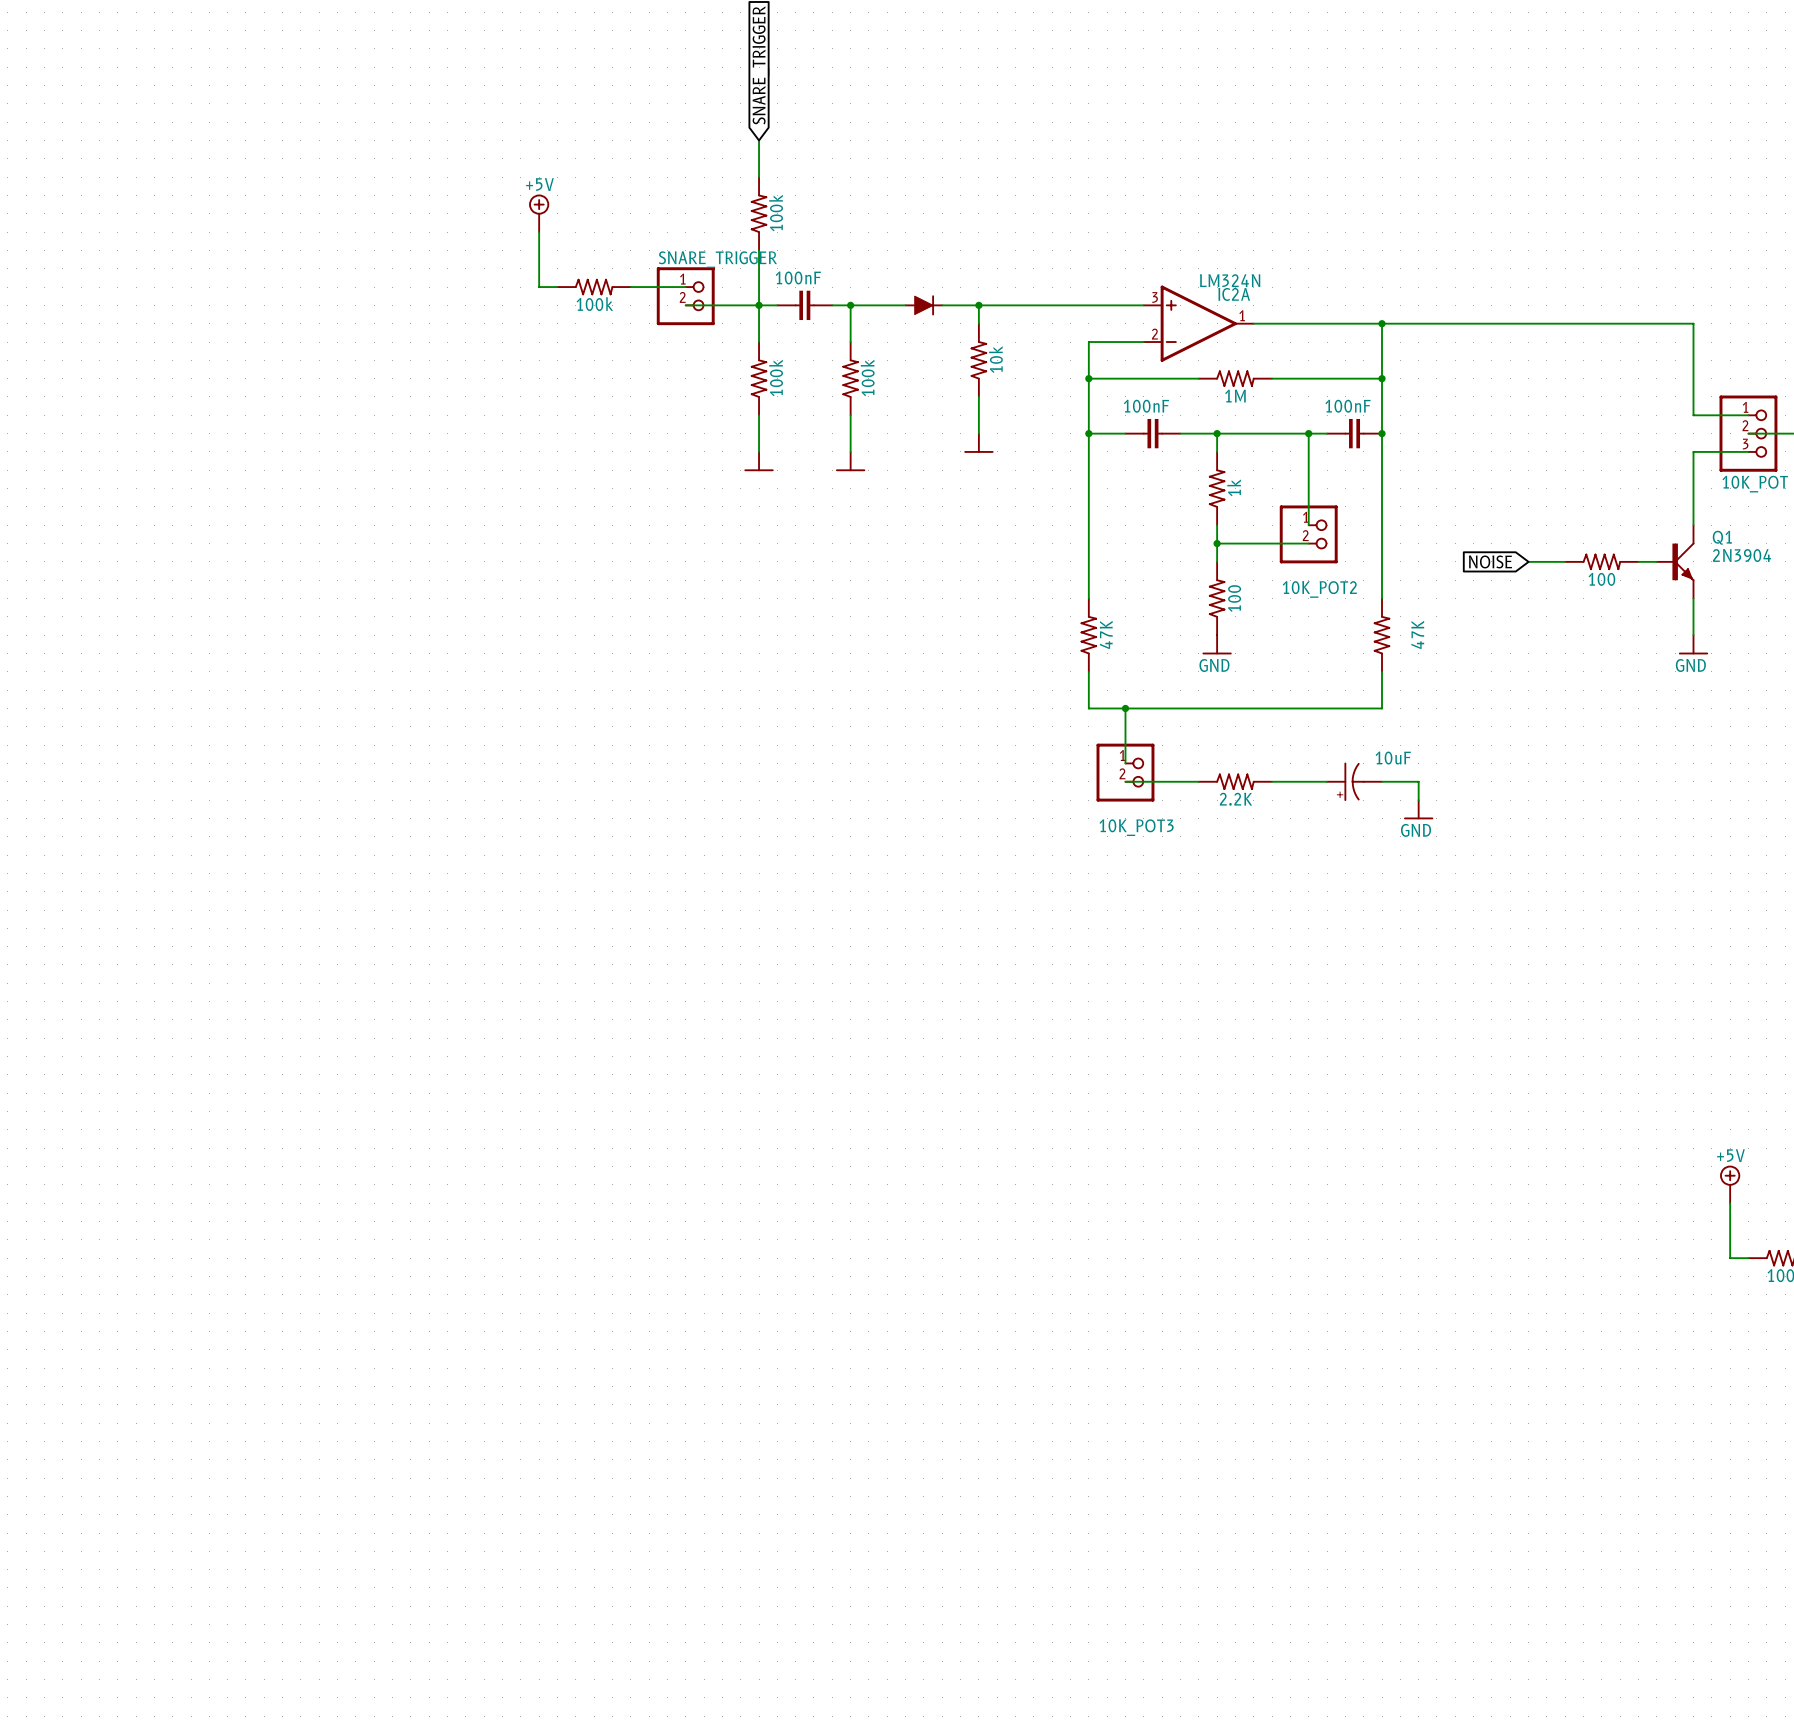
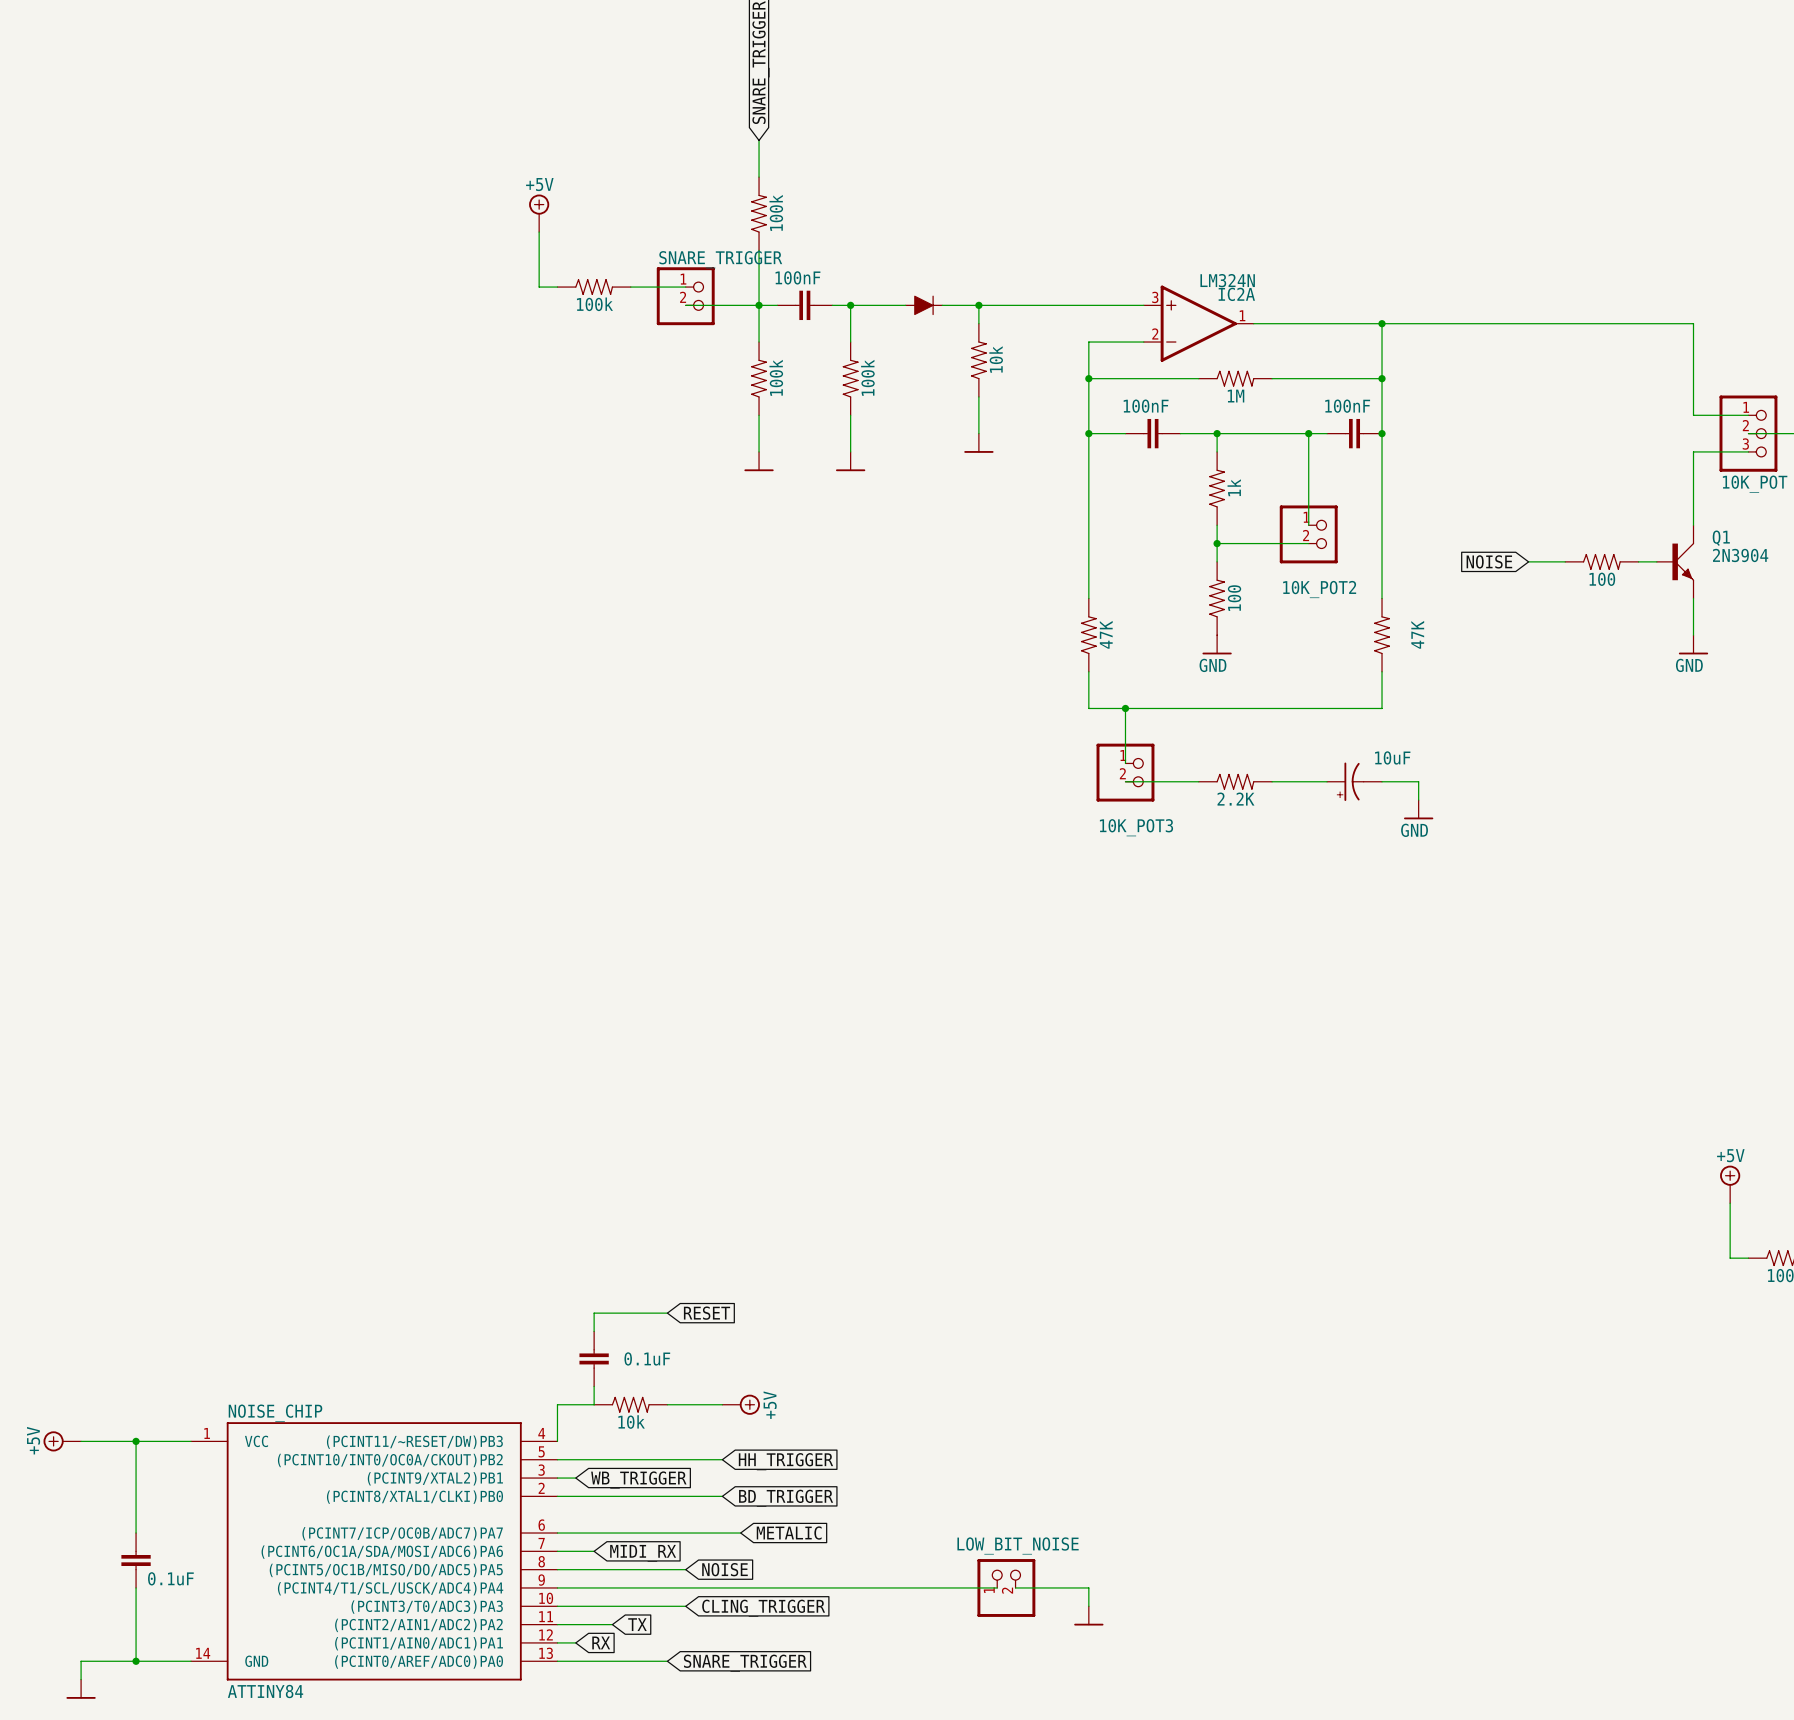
wire: none -> (667, 1313) (594, 1313) (594, 1331)
global label: none -> RESET (707, 1313)
part: none -> 0.1uF (594, 1358)
wire: none -> (594, 1386) (594, 1404) (557, 1404) (557, 1441)
part: none -> 10k (630, 1404)
wire: none -> (667, 1404) (722, 1404)
power symbol: none -> +5V (741, 1404)
power symbol: none -> +5V (62, 1441)
wire: none -> (81, 1441) (191, 1441)
wire: none -> (136, 1441) (136, 1533)
junction: none -> (136, 1441)
wire: none -> (557, 1459) (722, 1459)
global label: none -> HH_TRIGGER (785, 1461)
wire: none -> (557, 1478) (575, 1478)
global label: none -> WB_TRIGGER (638, 1480)
wire: none -> (557, 1496) (722, 1496)
global label: none -> BD_TRIGGER (786, 1498)
wire: none -> (557, 1533) (740, 1533)
global label: none -> METALIC (789, 1533)
NOISE_CHIP: none -> ATTINY84 (374, 1551)
wire: none -> (557, 1551) (594, 1551)
global label: none -> MIDI_RX (643, 1553)
part: none -> 0.1uF (136, 1560)
wire: none -> (557, 1569) (685, 1569)
global label: none -> NOISE (724, 1569)
wire: none -> (136, 1587) (136, 1661)
wire: none -> (557, 1587) (997, 1587)
LOW_BIT_NOISE: none -> (1006, 1587)
wire: none -> (1015, 1587) (1088, 1587) (1088, 1606)
wire: none -> (557, 1606) (685, 1606)
global label: none -> CLING_TRIGGER (763, 1608)
power symbol: none -> (1088, 1615)
wire: none -> (557, 1624) (612, 1624)
global label: none -> TX (637, 1624)
wire: none -> (557, 1642) (575, 1642)
global label: none -> RX (601, 1642)
junction: none -> (136, 1661)
wire: none -> (191, 1661) (81, 1661) (81, 1679)
wire: none -> (557, 1661) (667, 1661)
global label: none -> SNARE_TRIGGER (745, 1663)
power symbol: none -> (81, 1689)

